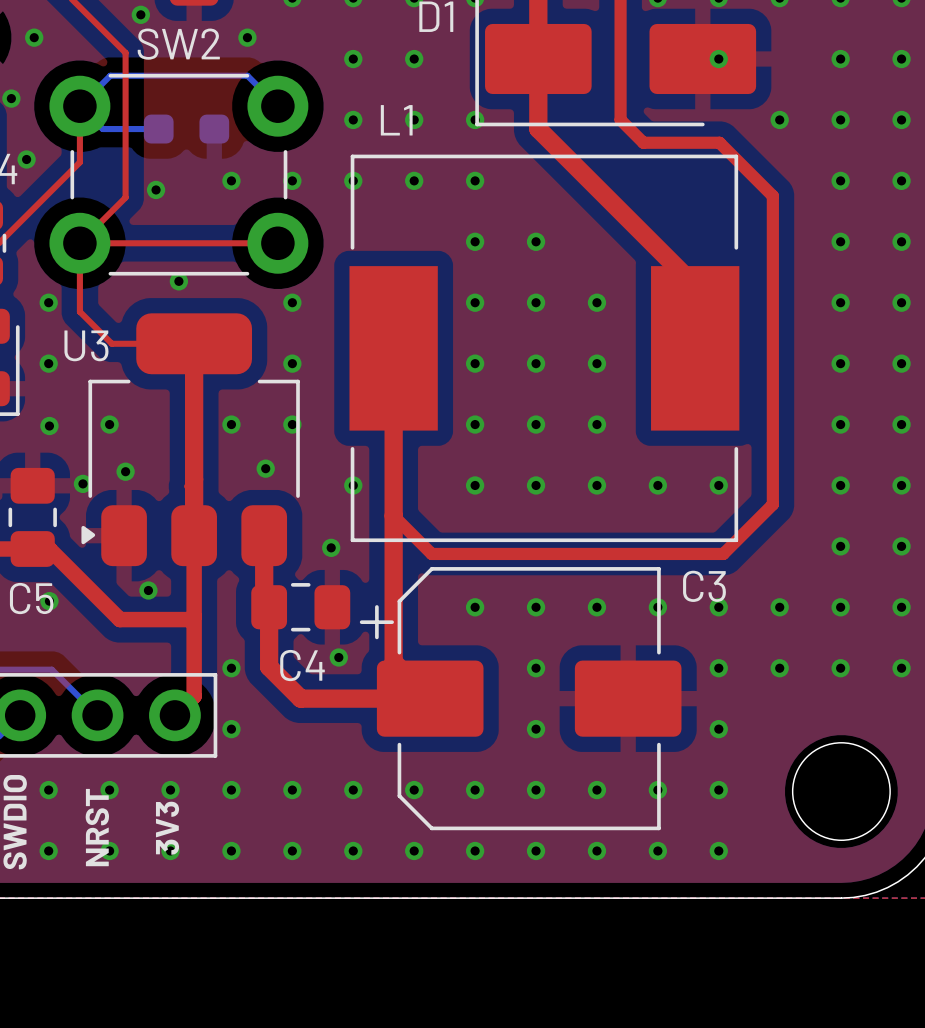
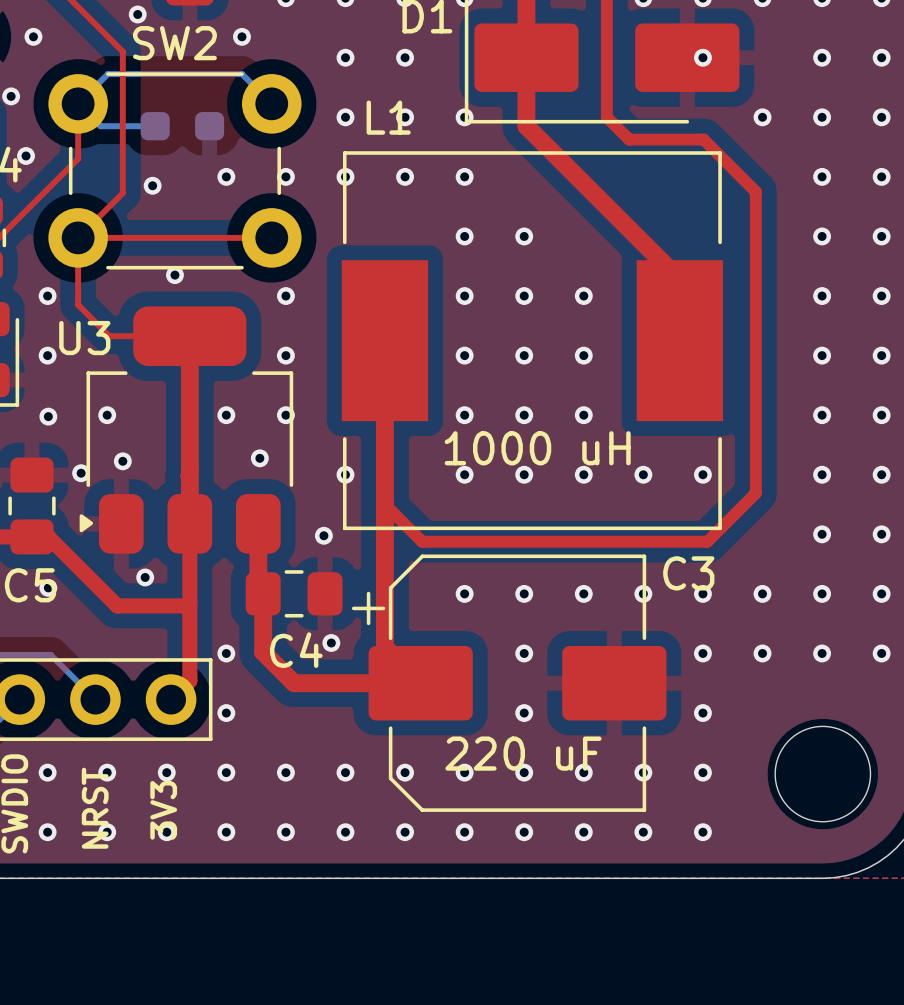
L1 value: none -> 1000 uH (537, 448)
C3 value: none -> 220 uF (523, 753)

